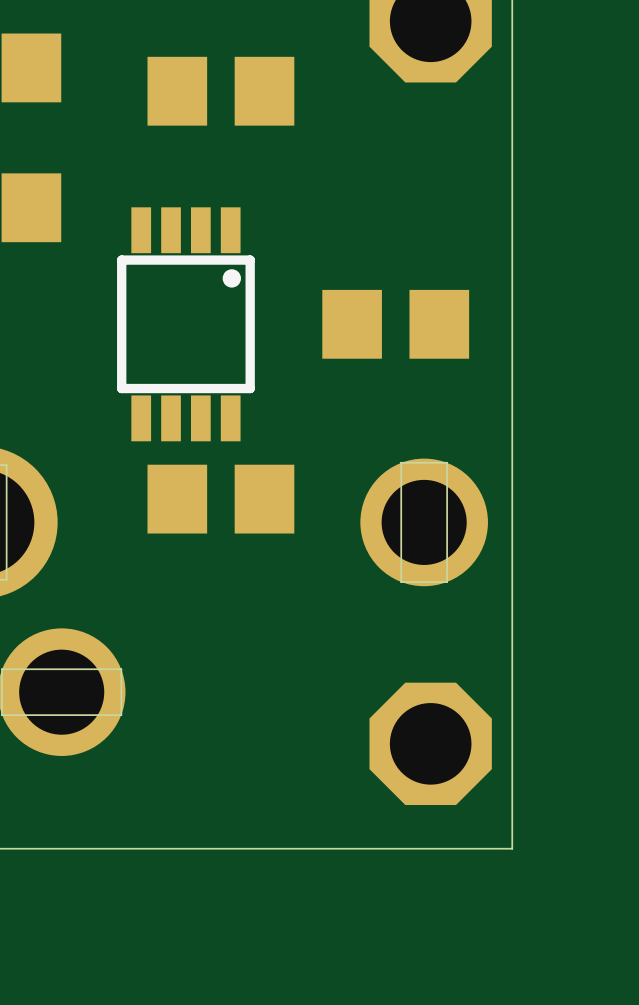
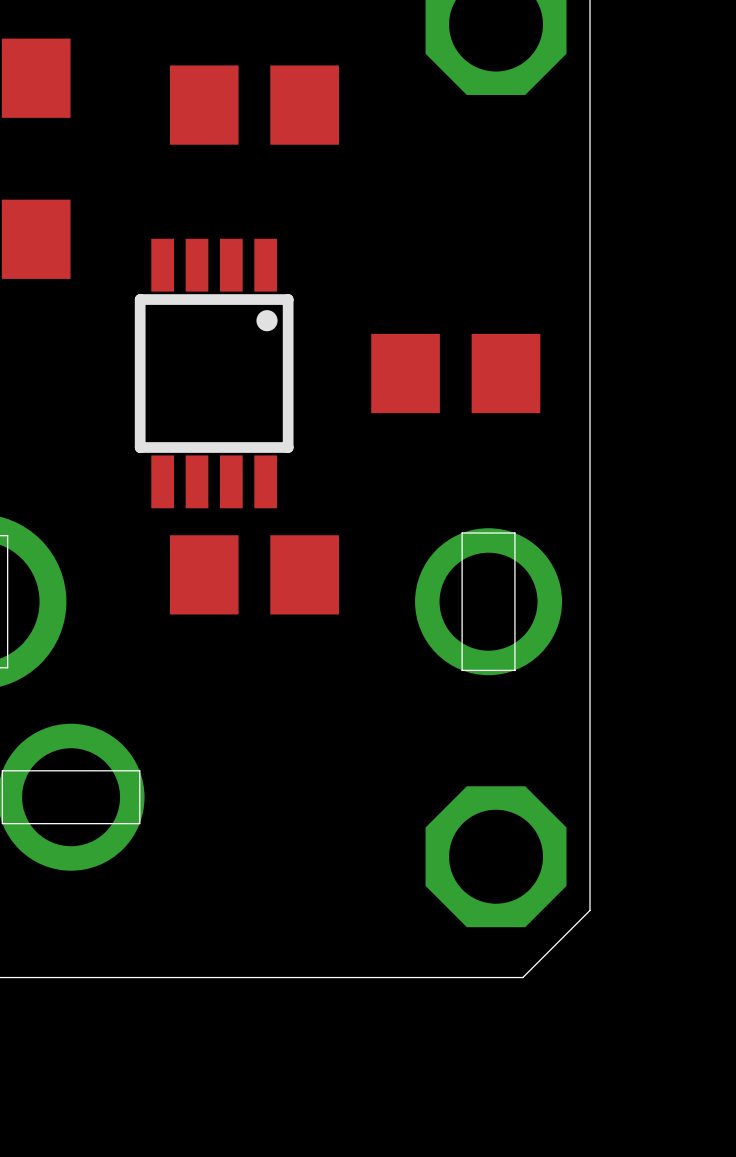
board edge: (512, 790) (512, 848) (453, 848) -> (589, 910) (522, 977)

